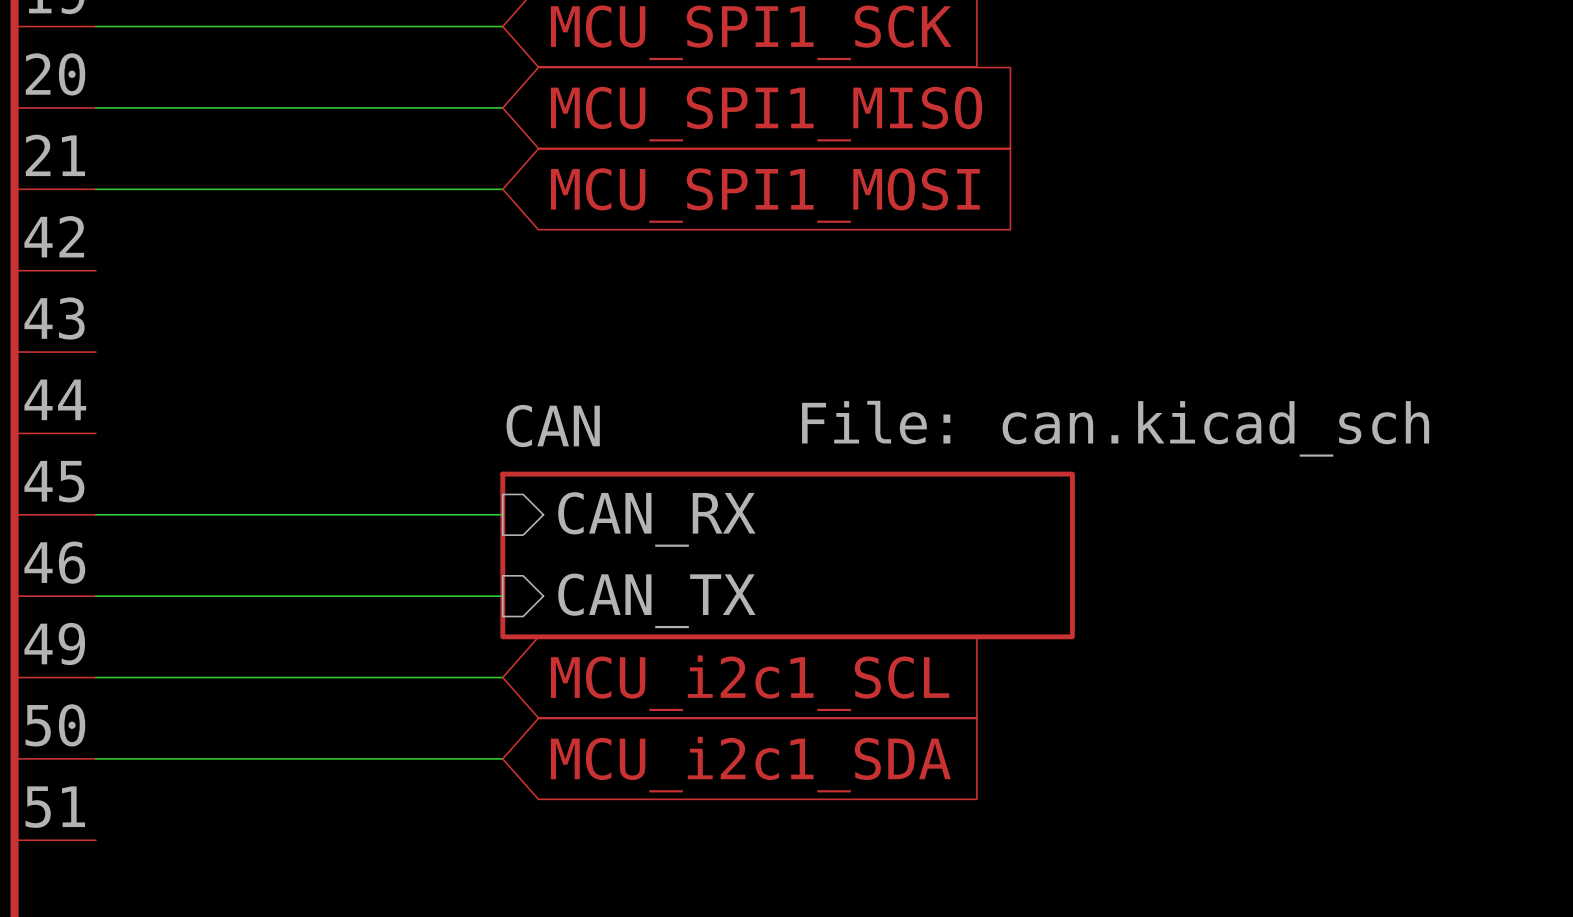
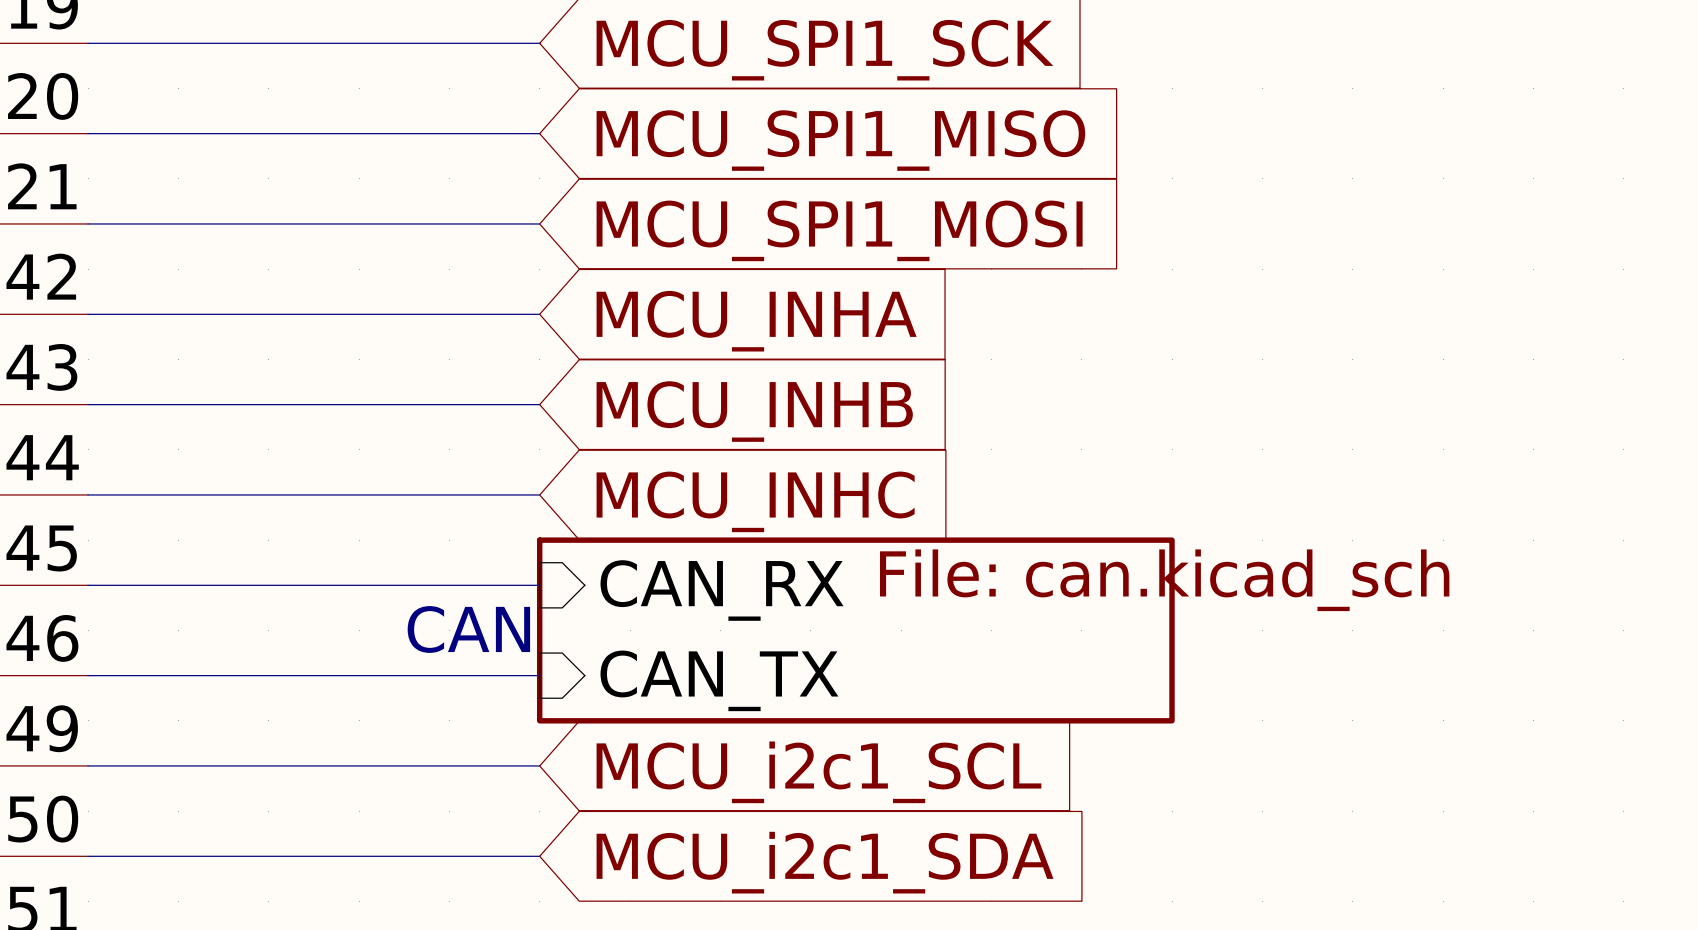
wire: none -> (88, 314) (539, 314)
global label: none -> MCU_INHA (756, 321)
wire: none -> (88, 404) (539, 404)
global label: none -> MCU_INHB (754, 411)
sheet CAN name position: CAN (553, 426) -> CAN (468, 629)
sheet CAN value position: File: can.kicad_sch (1115, 428) -> File: can.kicad_sch (1164, 580)
wire: none -> (88, 494) (539, 494)
global label: none -> MCU_INHC (755, 501)

